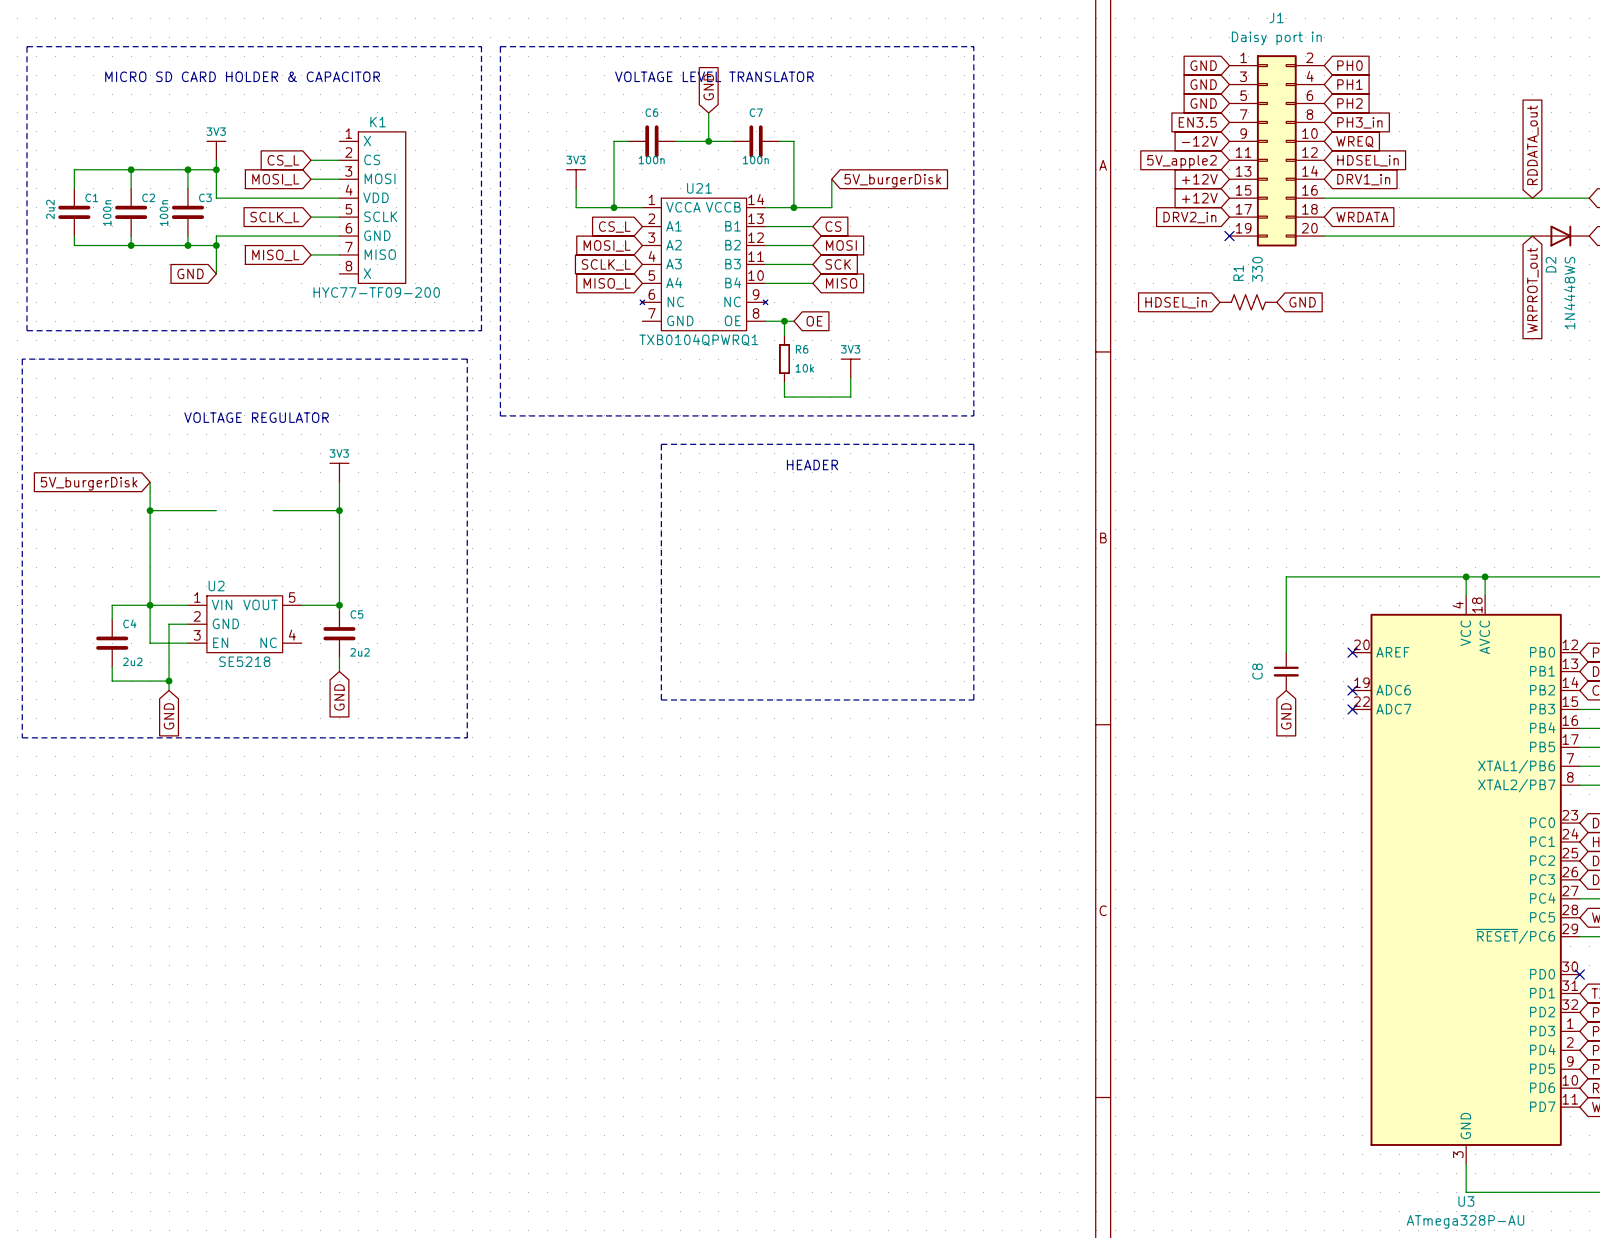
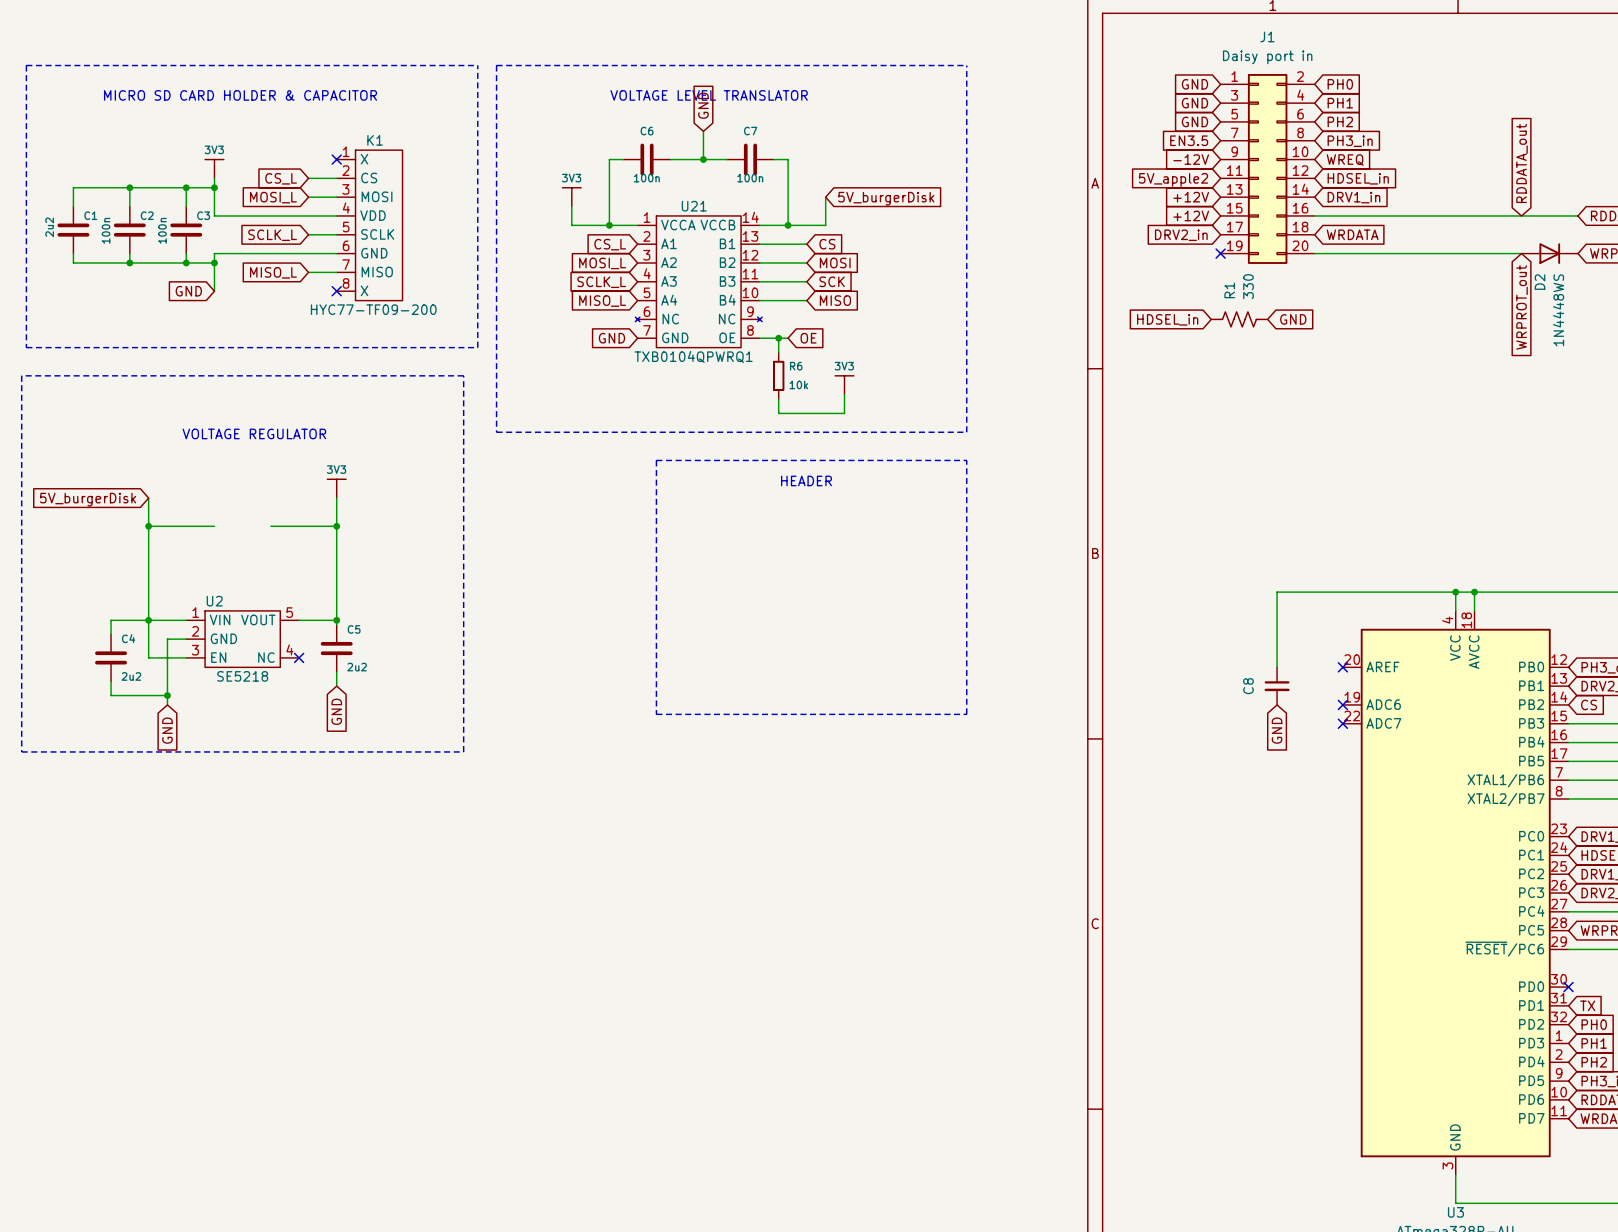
no-connect mark: none -> (336, 159)
no-connect mark: none -> (336, 291)
global label: none -> GND (611, 338)
no-connect mark: none -> (299, 657)

